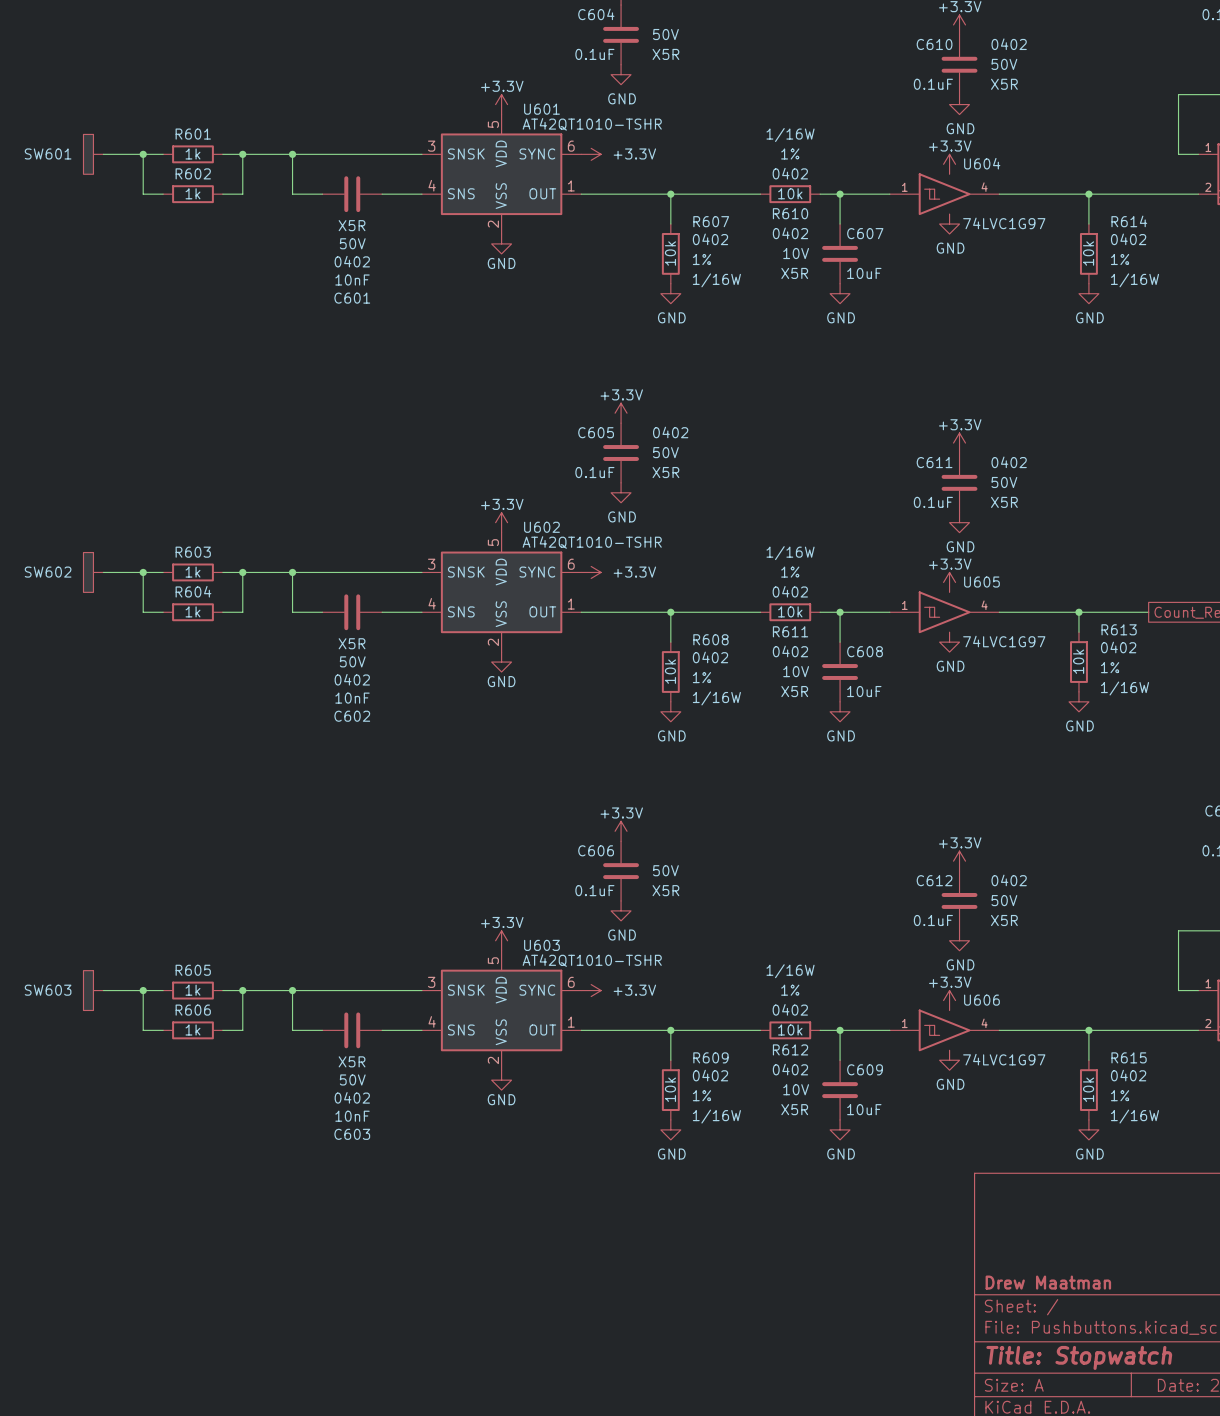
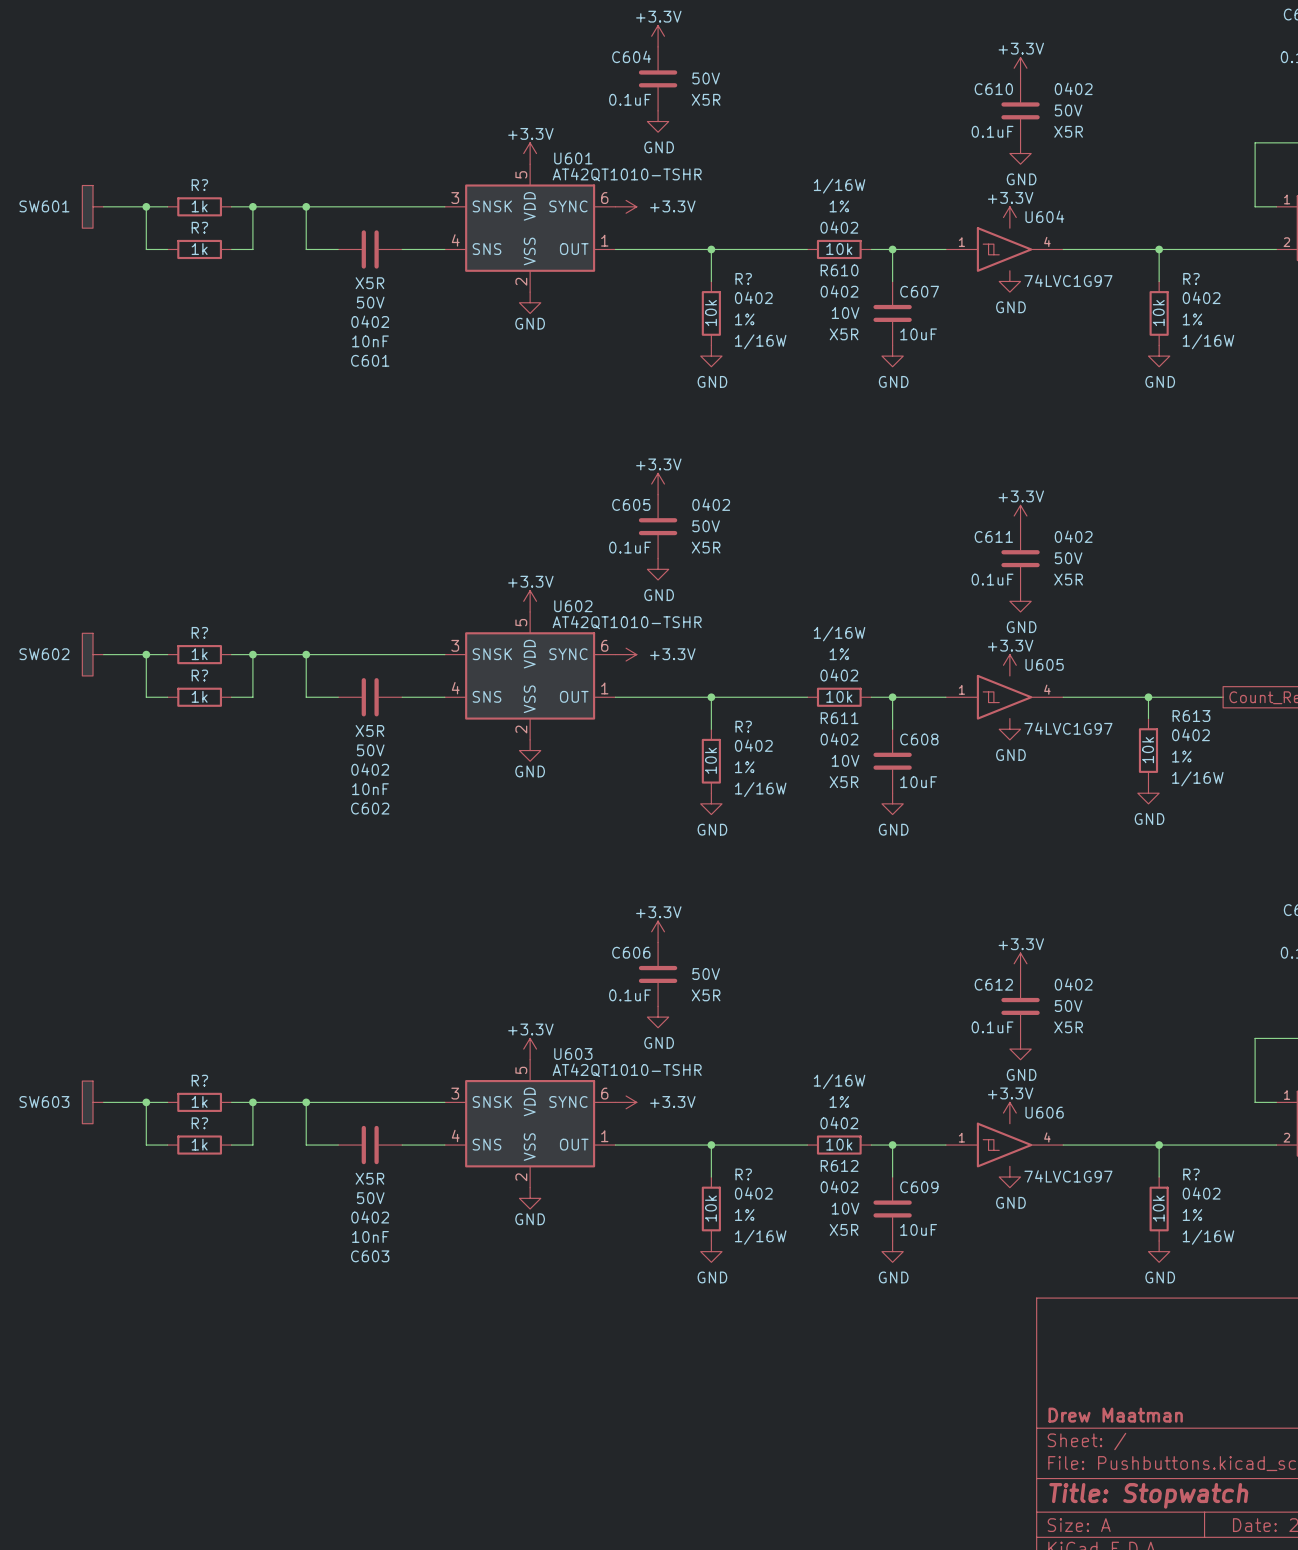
R601 name: R601 (193, 134) -> R? (199, 185)
R602 name: R602 (193, 173) -> R? (199, 227)
R607 name: R607 (711, 221) -> R? (743, 278)
R614 name: R614 (1129, 221) -> R? (1191, 278)
R603 name: R603 (193, 552) -> R? (199, 632)
R604 name: R604 (193, 591) -> R? (199, 675)
R608 name: R608 (710, 639) -> R? (743, 726)
R605 name: R605 (193, 970) -> R? (199, 1080)
R606 name: R606 (193, 1010) -> R? (199, 1123)
R609 name: R609 (710, 1057) -> R? (743, 1174)
R615 name: R615 (1129, 1057) -> R? (1191, 1174)

